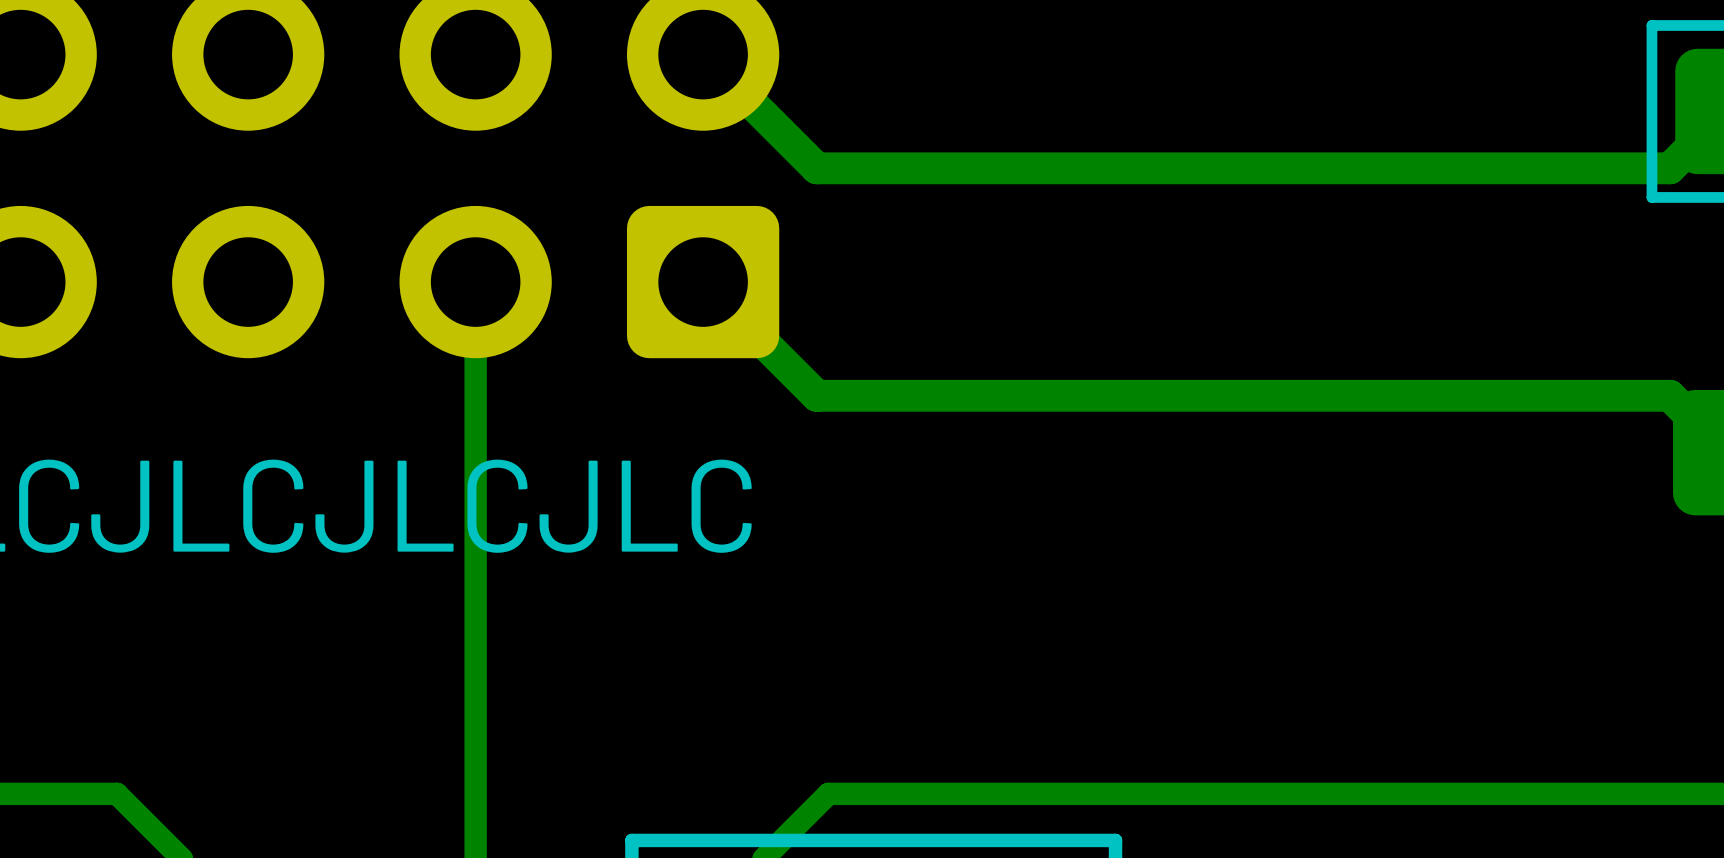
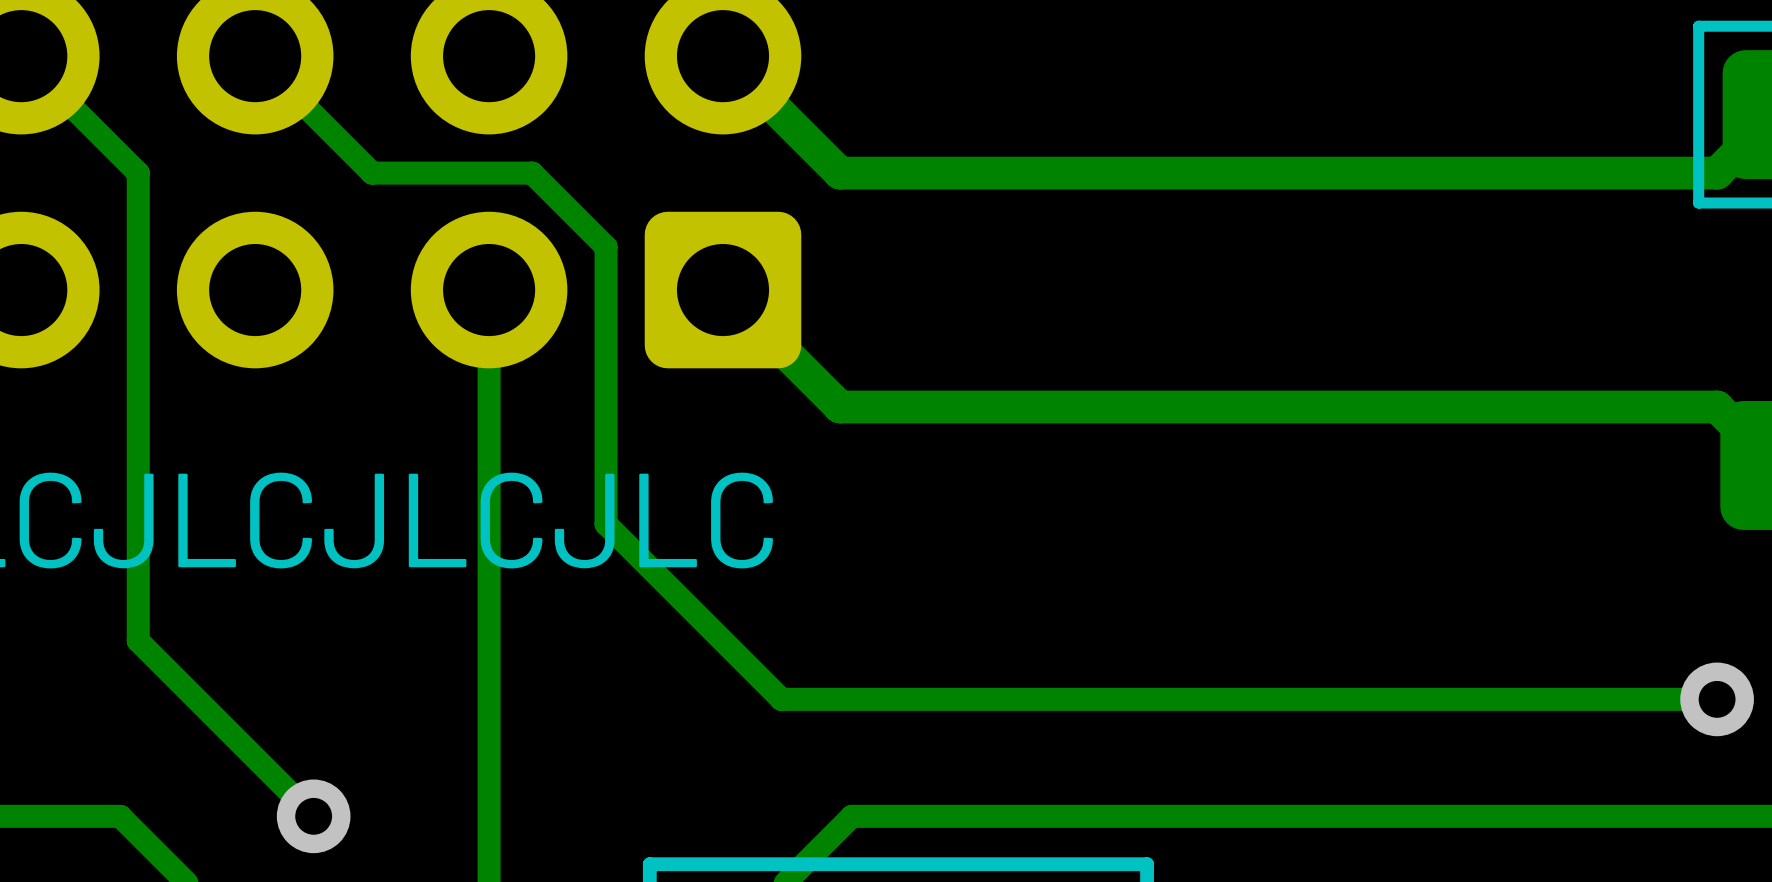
track: none -> (21, 56) (138, 173) (138, 640) (313, 816)
track: none -> (255, 56) (372, 173) (532, 173) (606, 247) (606, 523) (781, 699) (1717, 699)
via: none -> (1717, 699)
via: none -> (313, 816)

